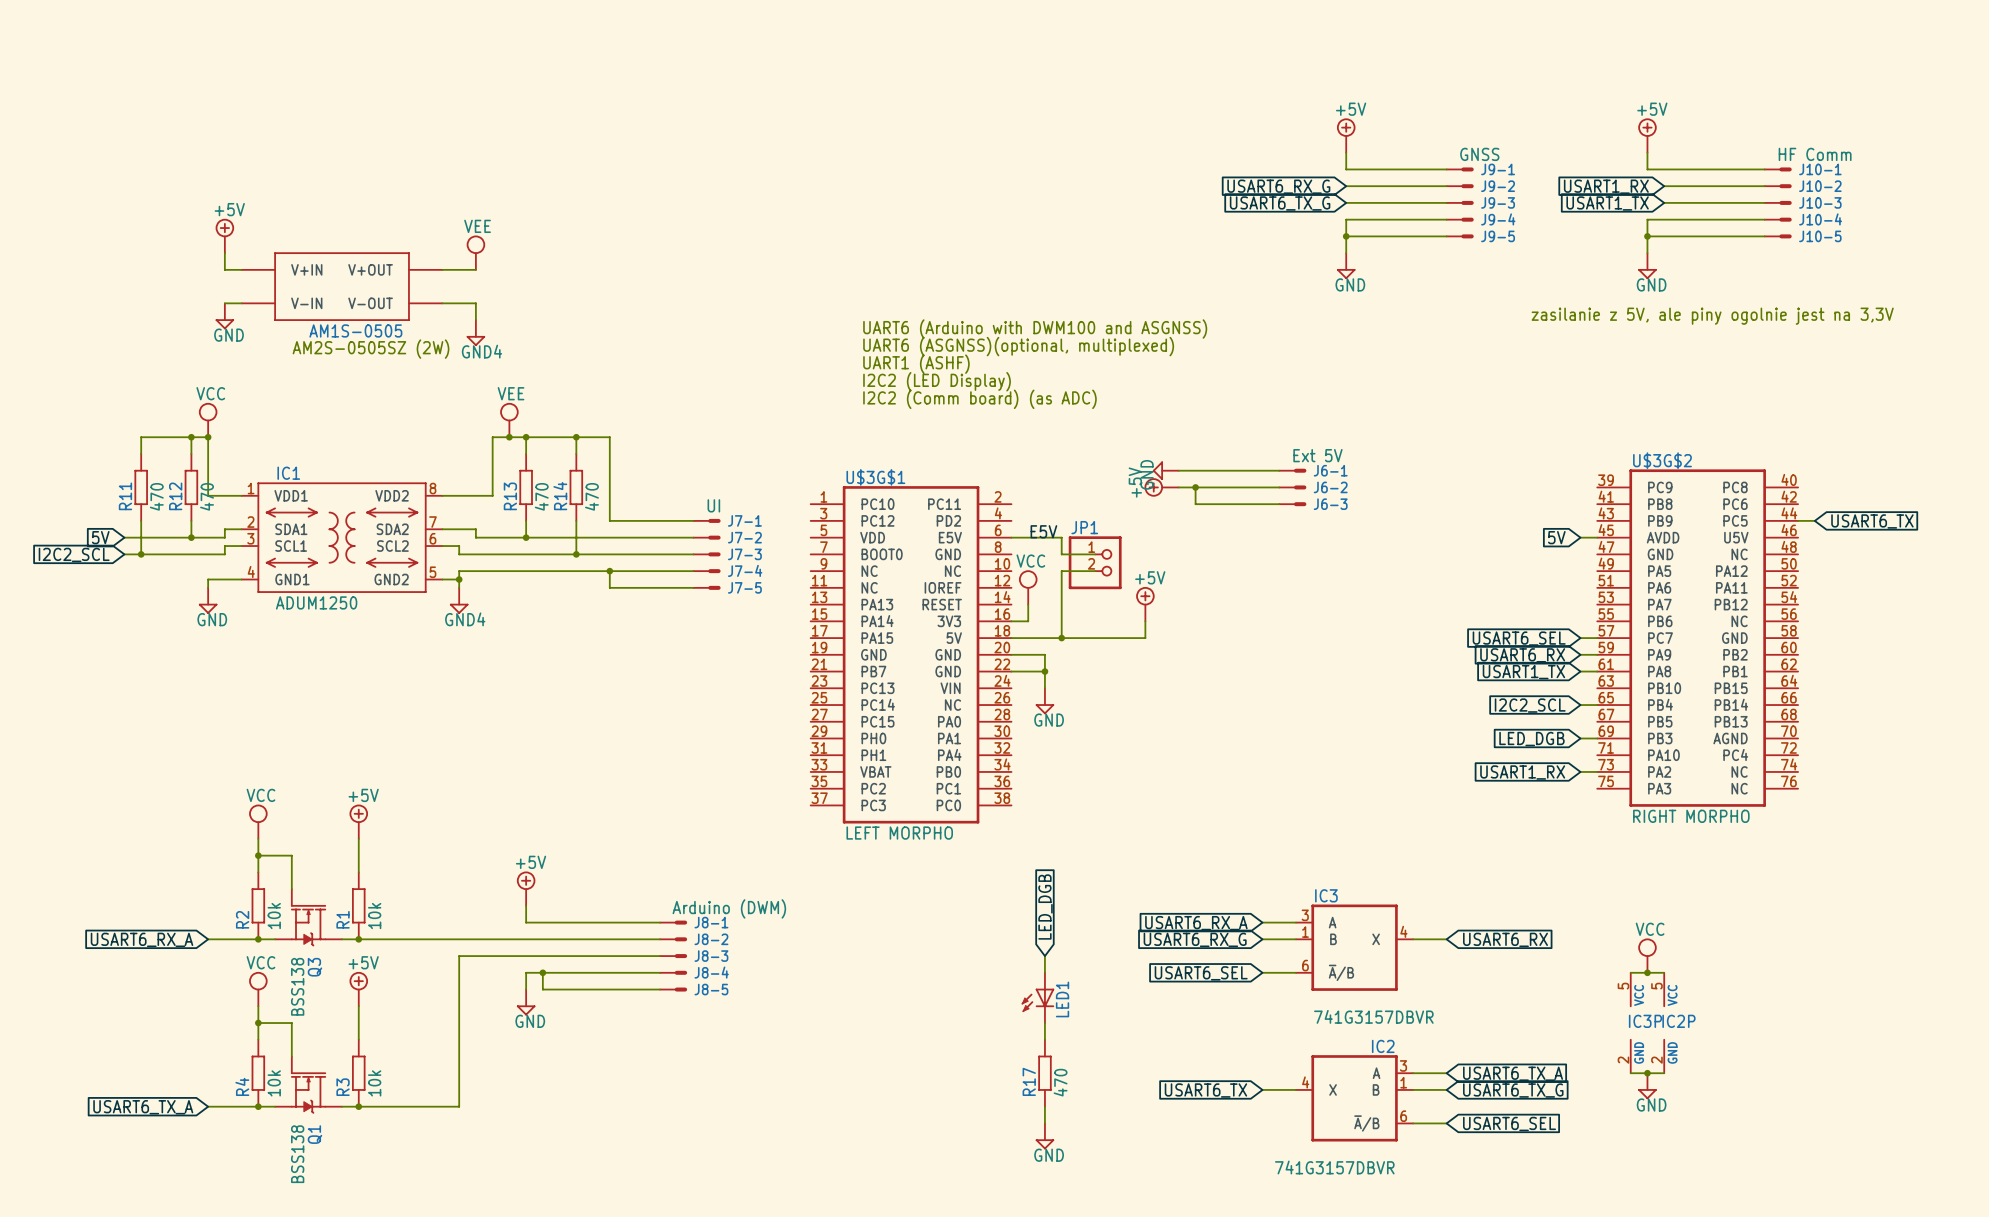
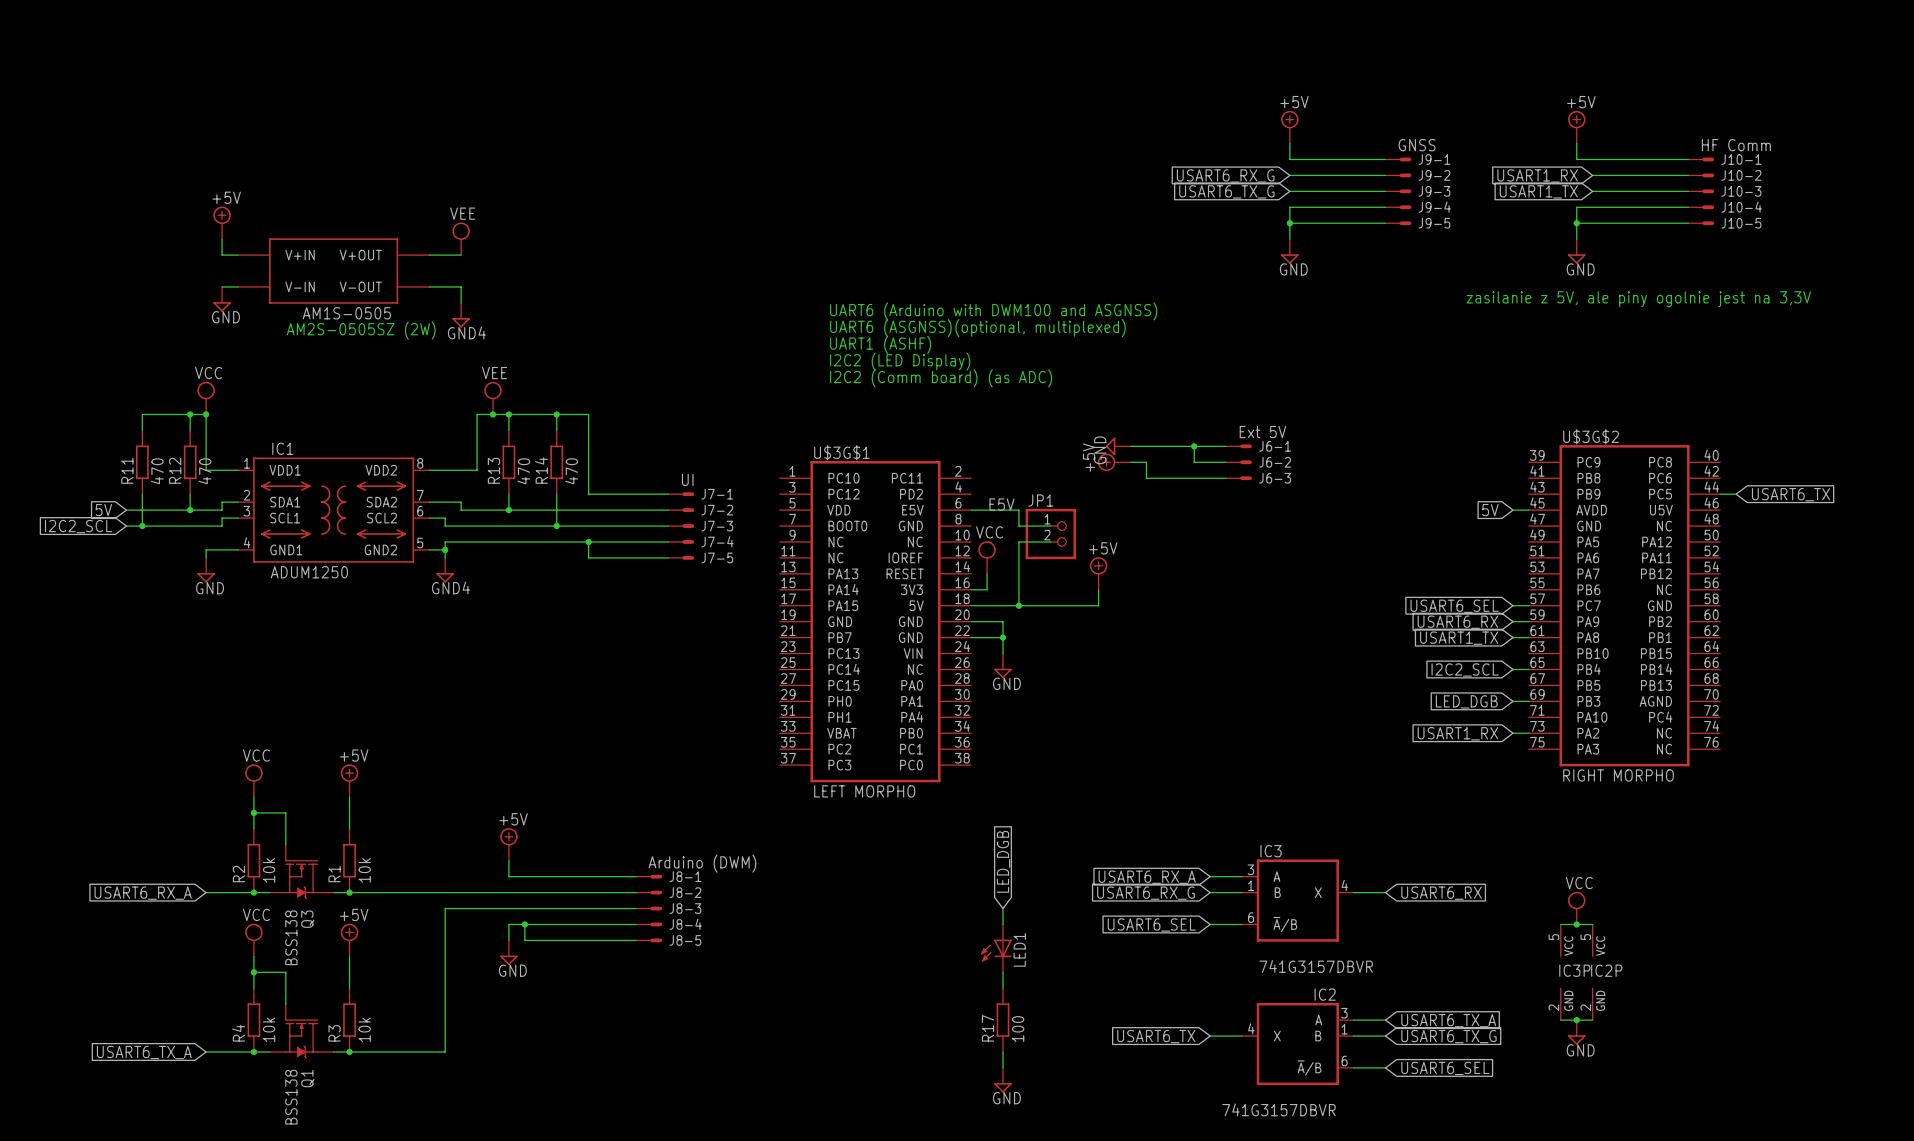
junction: none -> (1194, 446)
wire: (1195, 487) (1245, 487) -> (1194, 446) (1194, 462)
junction: (1195, 487) -> none
R17 value: 470 (1060, 1082) -> 100 (1018, 1029)

